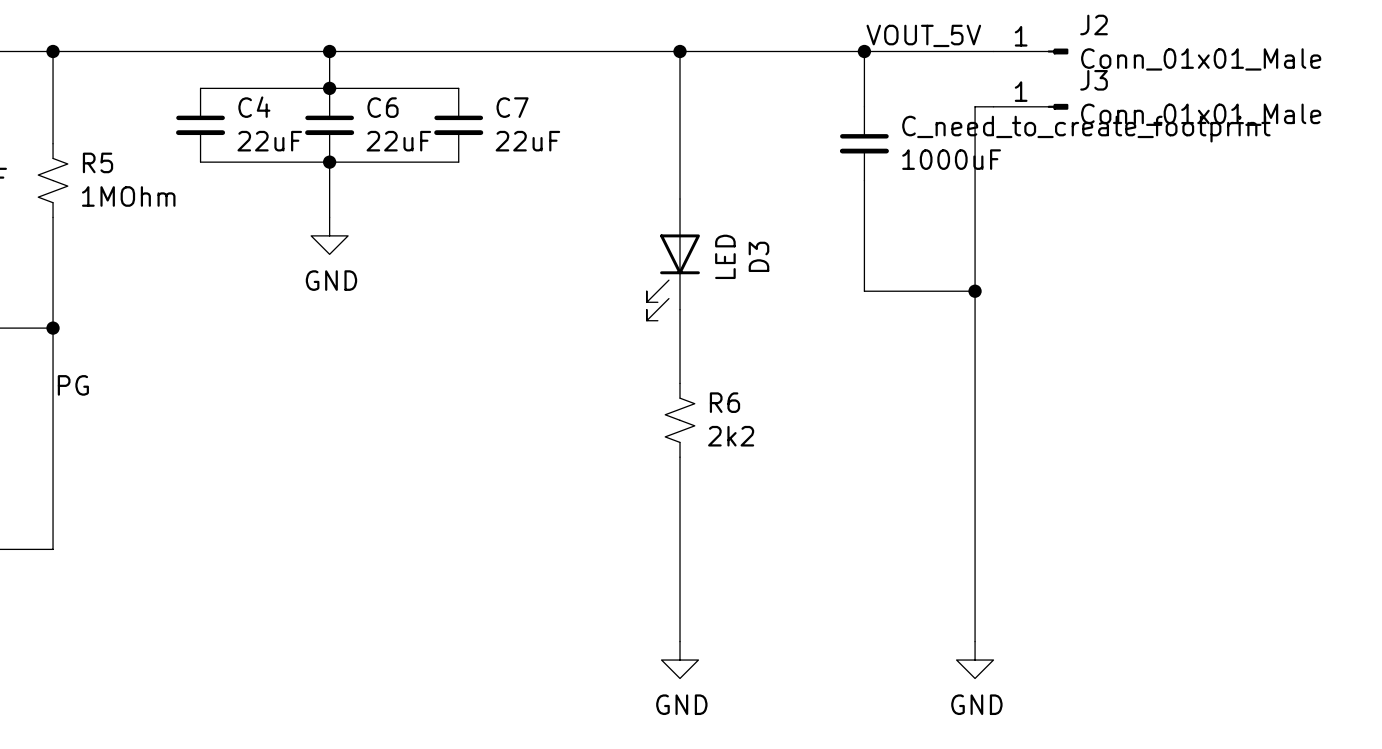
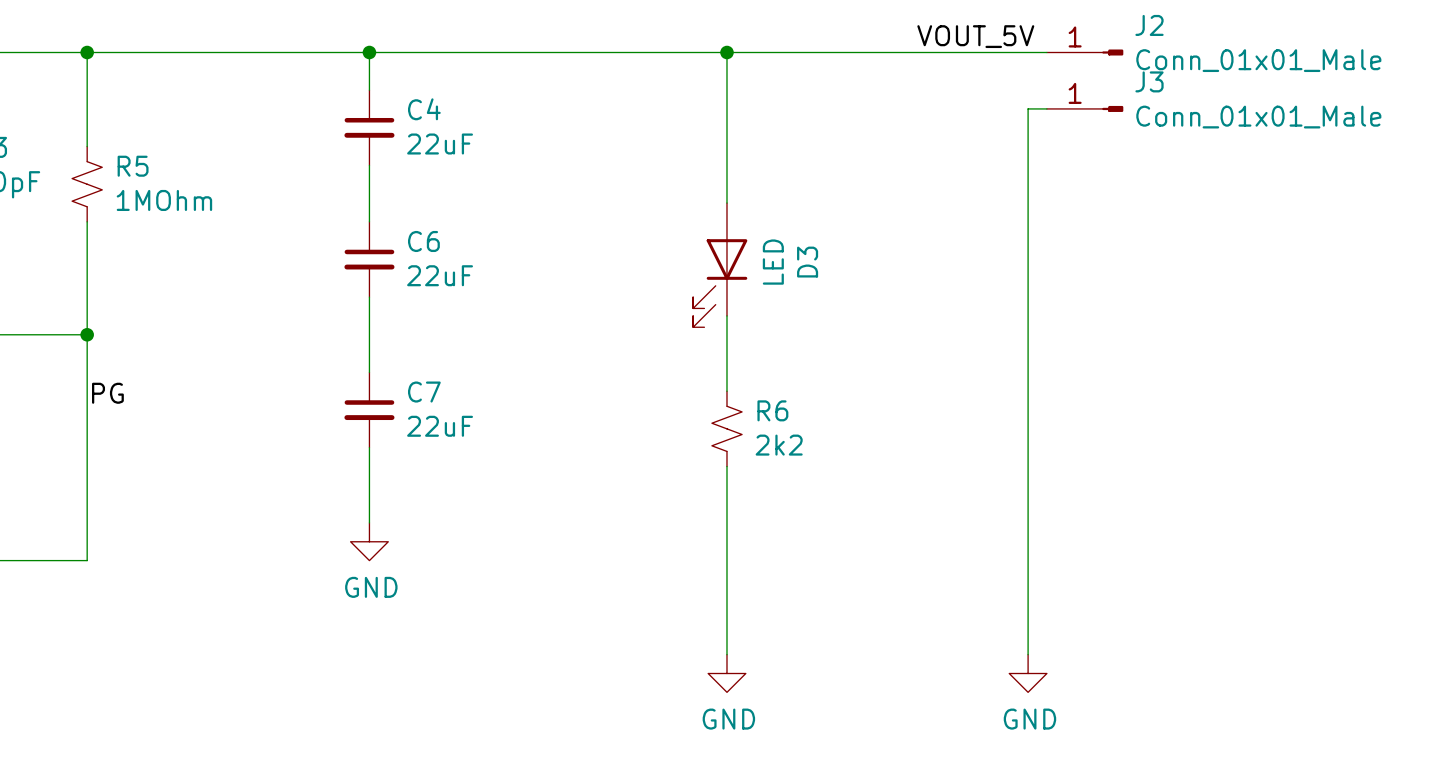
wire: (864, 51) (864, 106) -> none
junction: (864, 51) -> none
wire: (200, 88) (458, 88) -> none
junction: (329, 88) -> none
C6 name: C6 (383, 107) -> C4 (424, 109)
C4: 22uF (200, 125) -> none
C7 position: (458, 125) -> (369, 410)
C_need_to_create_footprint: 1000uF (864, 143) -> none
wire: (200, 162) (458, 162) -> none
junction: (329, 162) -> none
wire: (864, 180) (864, 291) (975, 291) -> none
power symbol position: GND (329, 235) -> GND (369, 541)
C6: none -> 22uF (369, 259)
wire: none -> (369, 297) (369, 372)
junction: (975, 291) -> none
wire: none -> (369, 447) (369, 522)

